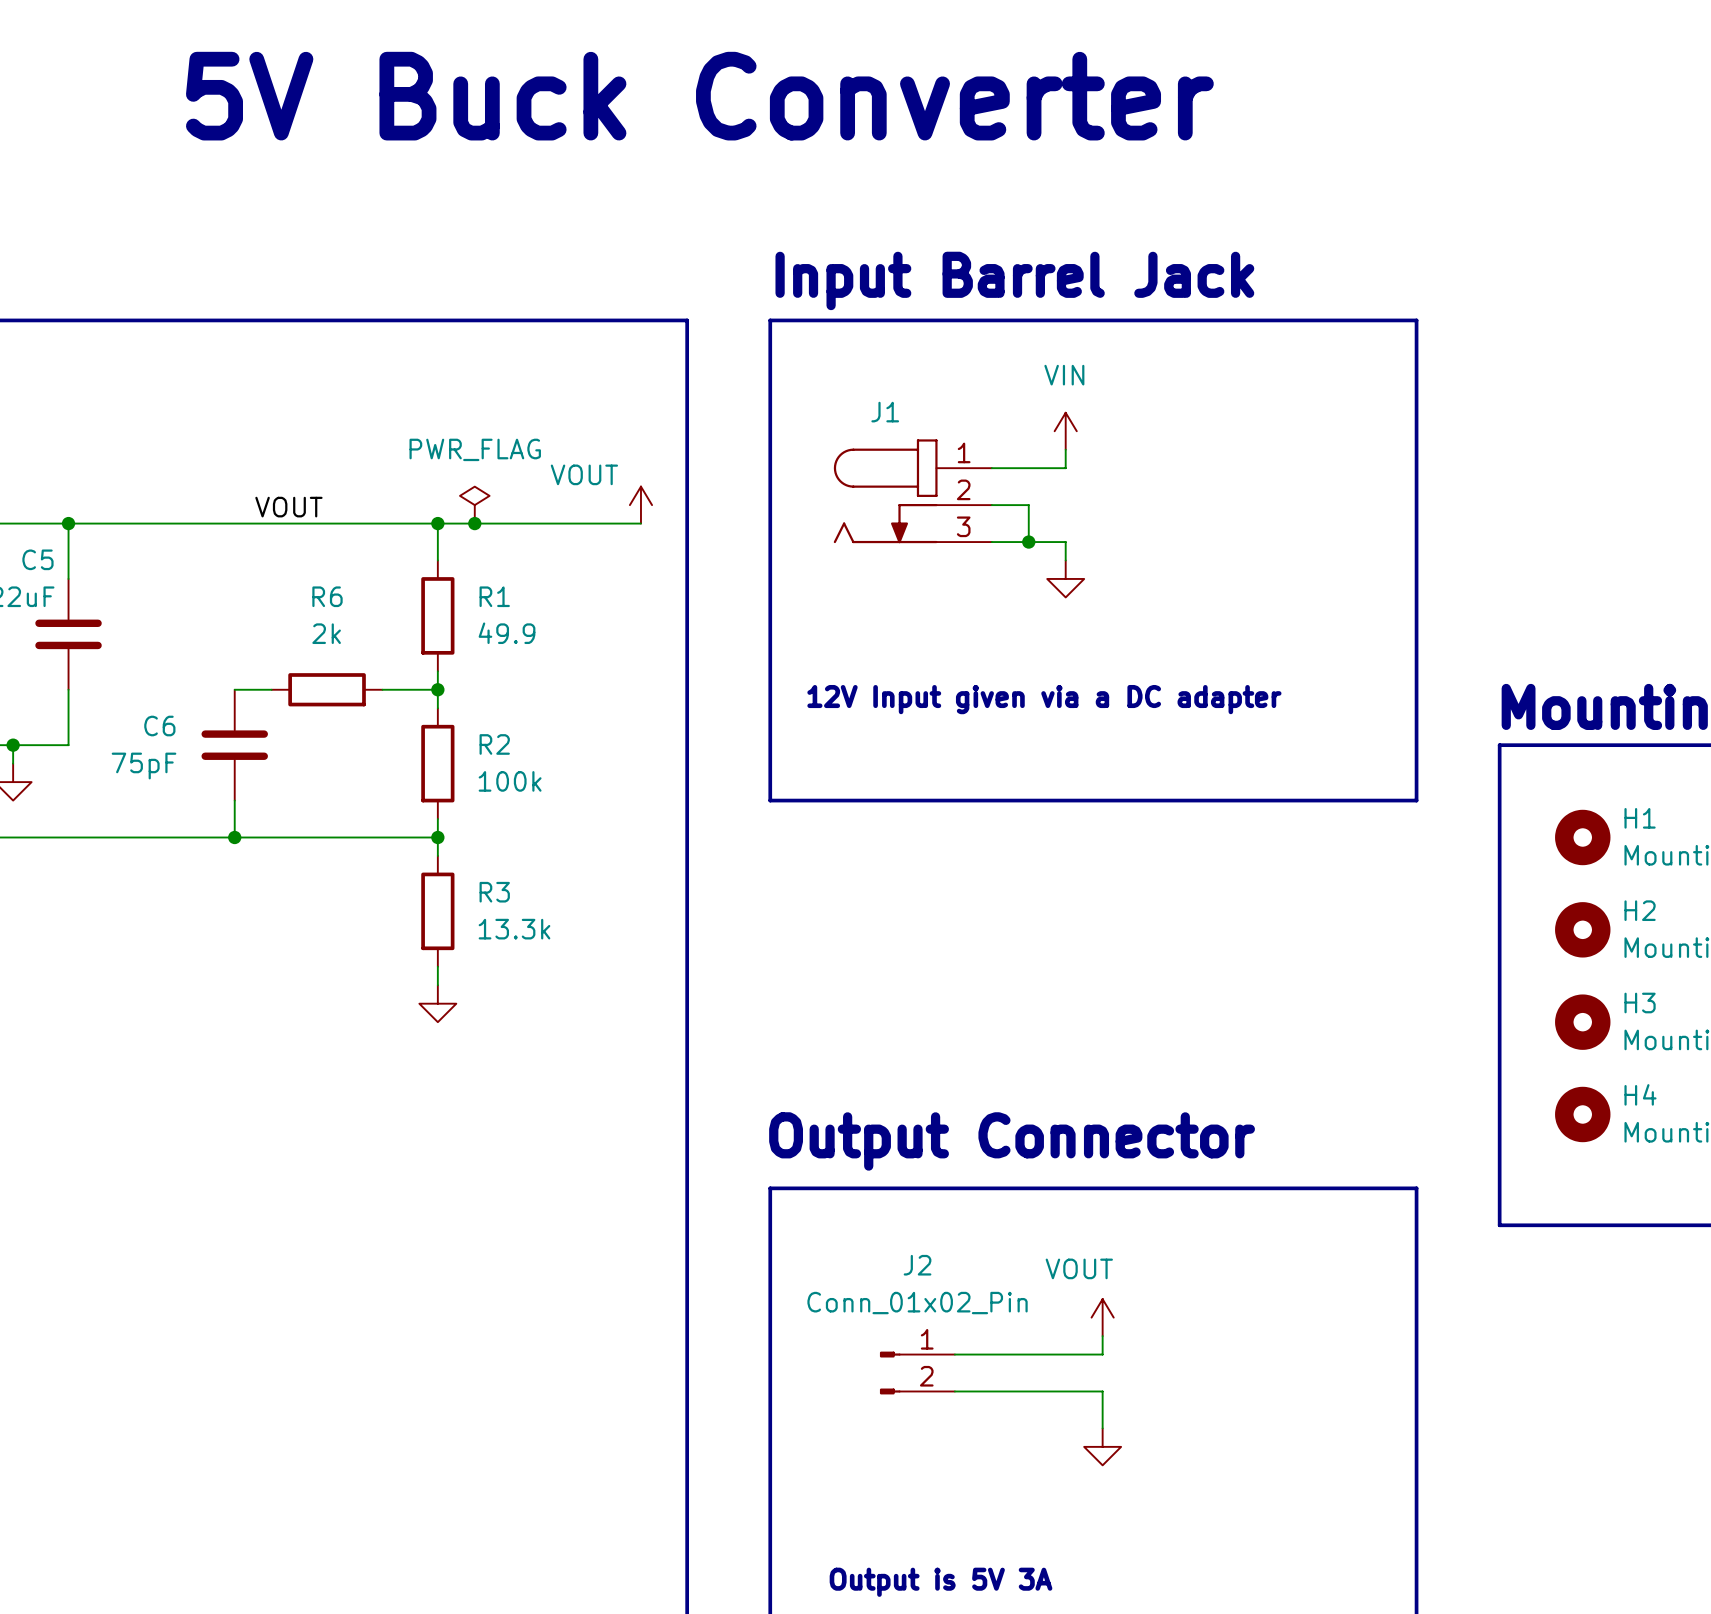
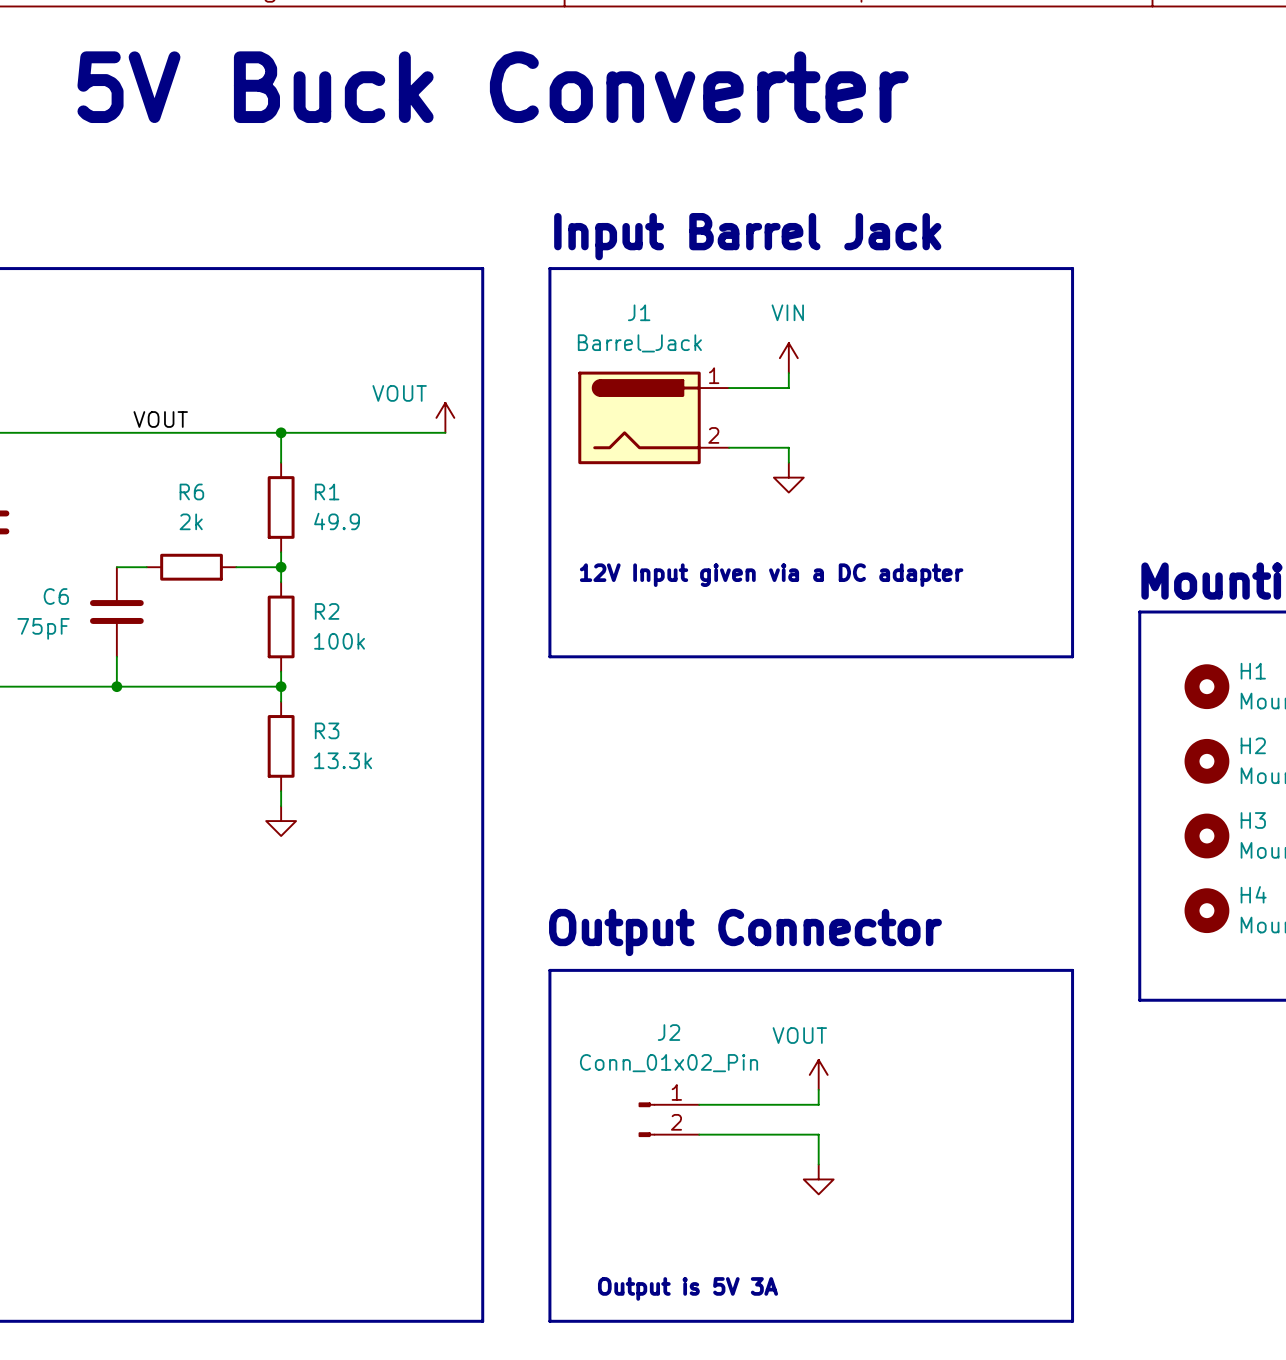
J1 value: none -> Barrel_Jack (639, 343)
J1 name position: J1 (885, 412) -> J1 (639, 312)
J1 symbol: [833, 439, 992, 544] -> [578, 371, 730, 465]
power symbol: PWR_FLAG (474, 505) -> none
wire: (991, 505) (1028, 505) (1028, 542) -> none
junction: (474, 523) -> none
junction: (1028, 542) -> none

